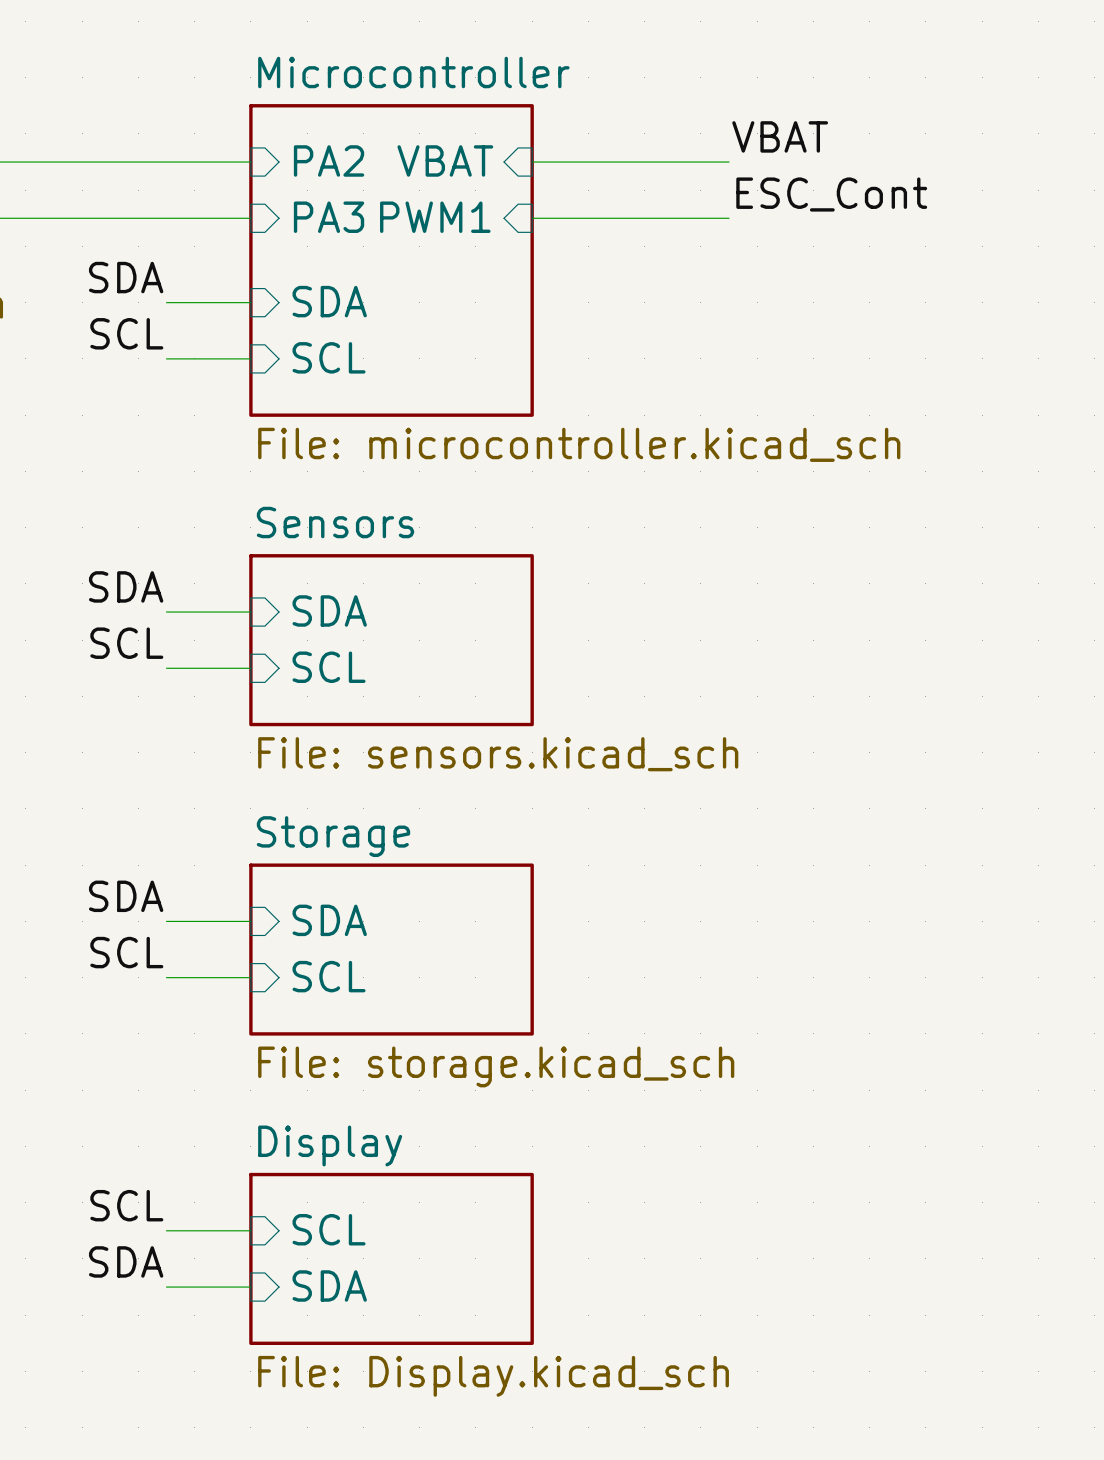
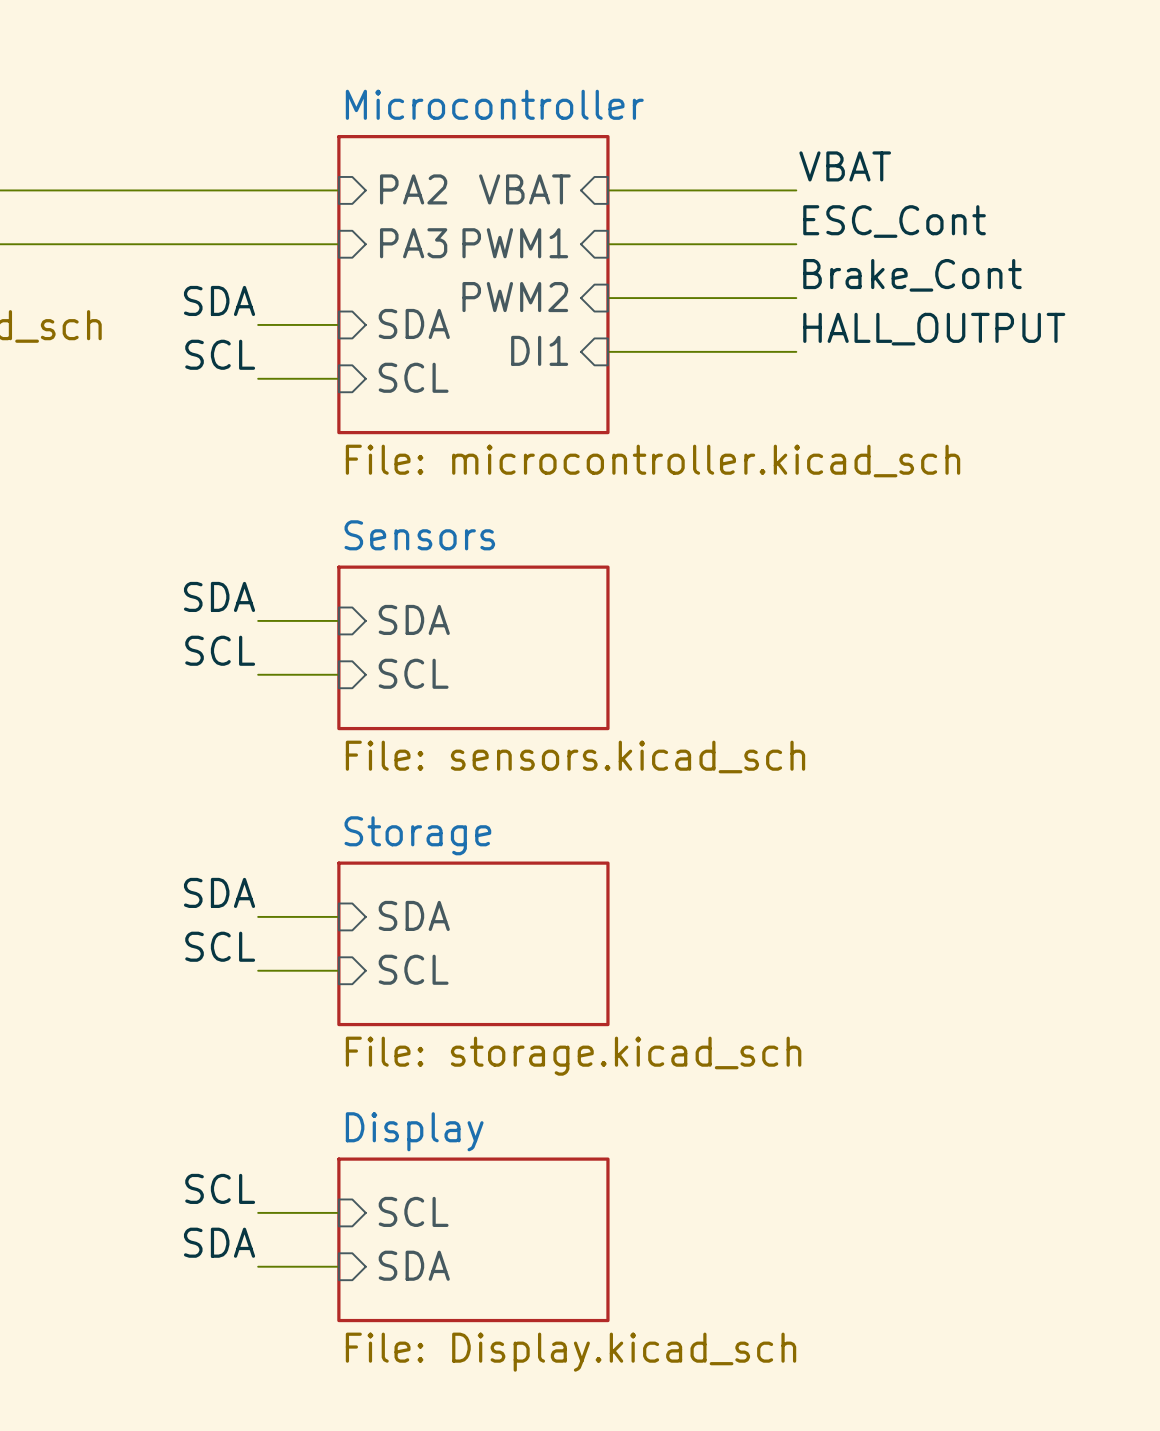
label: none -> Brake_Cont (912, 275)
sheet pin: none -> PWM2 (515, 297)
wire: none -> (607, 298) (796, 298)
label: none -> HALL_OUTPUT (934, 329)
sheet pin: none -> DI1 (539, 350)
wire: none -> (607, 351) (796, 351)

